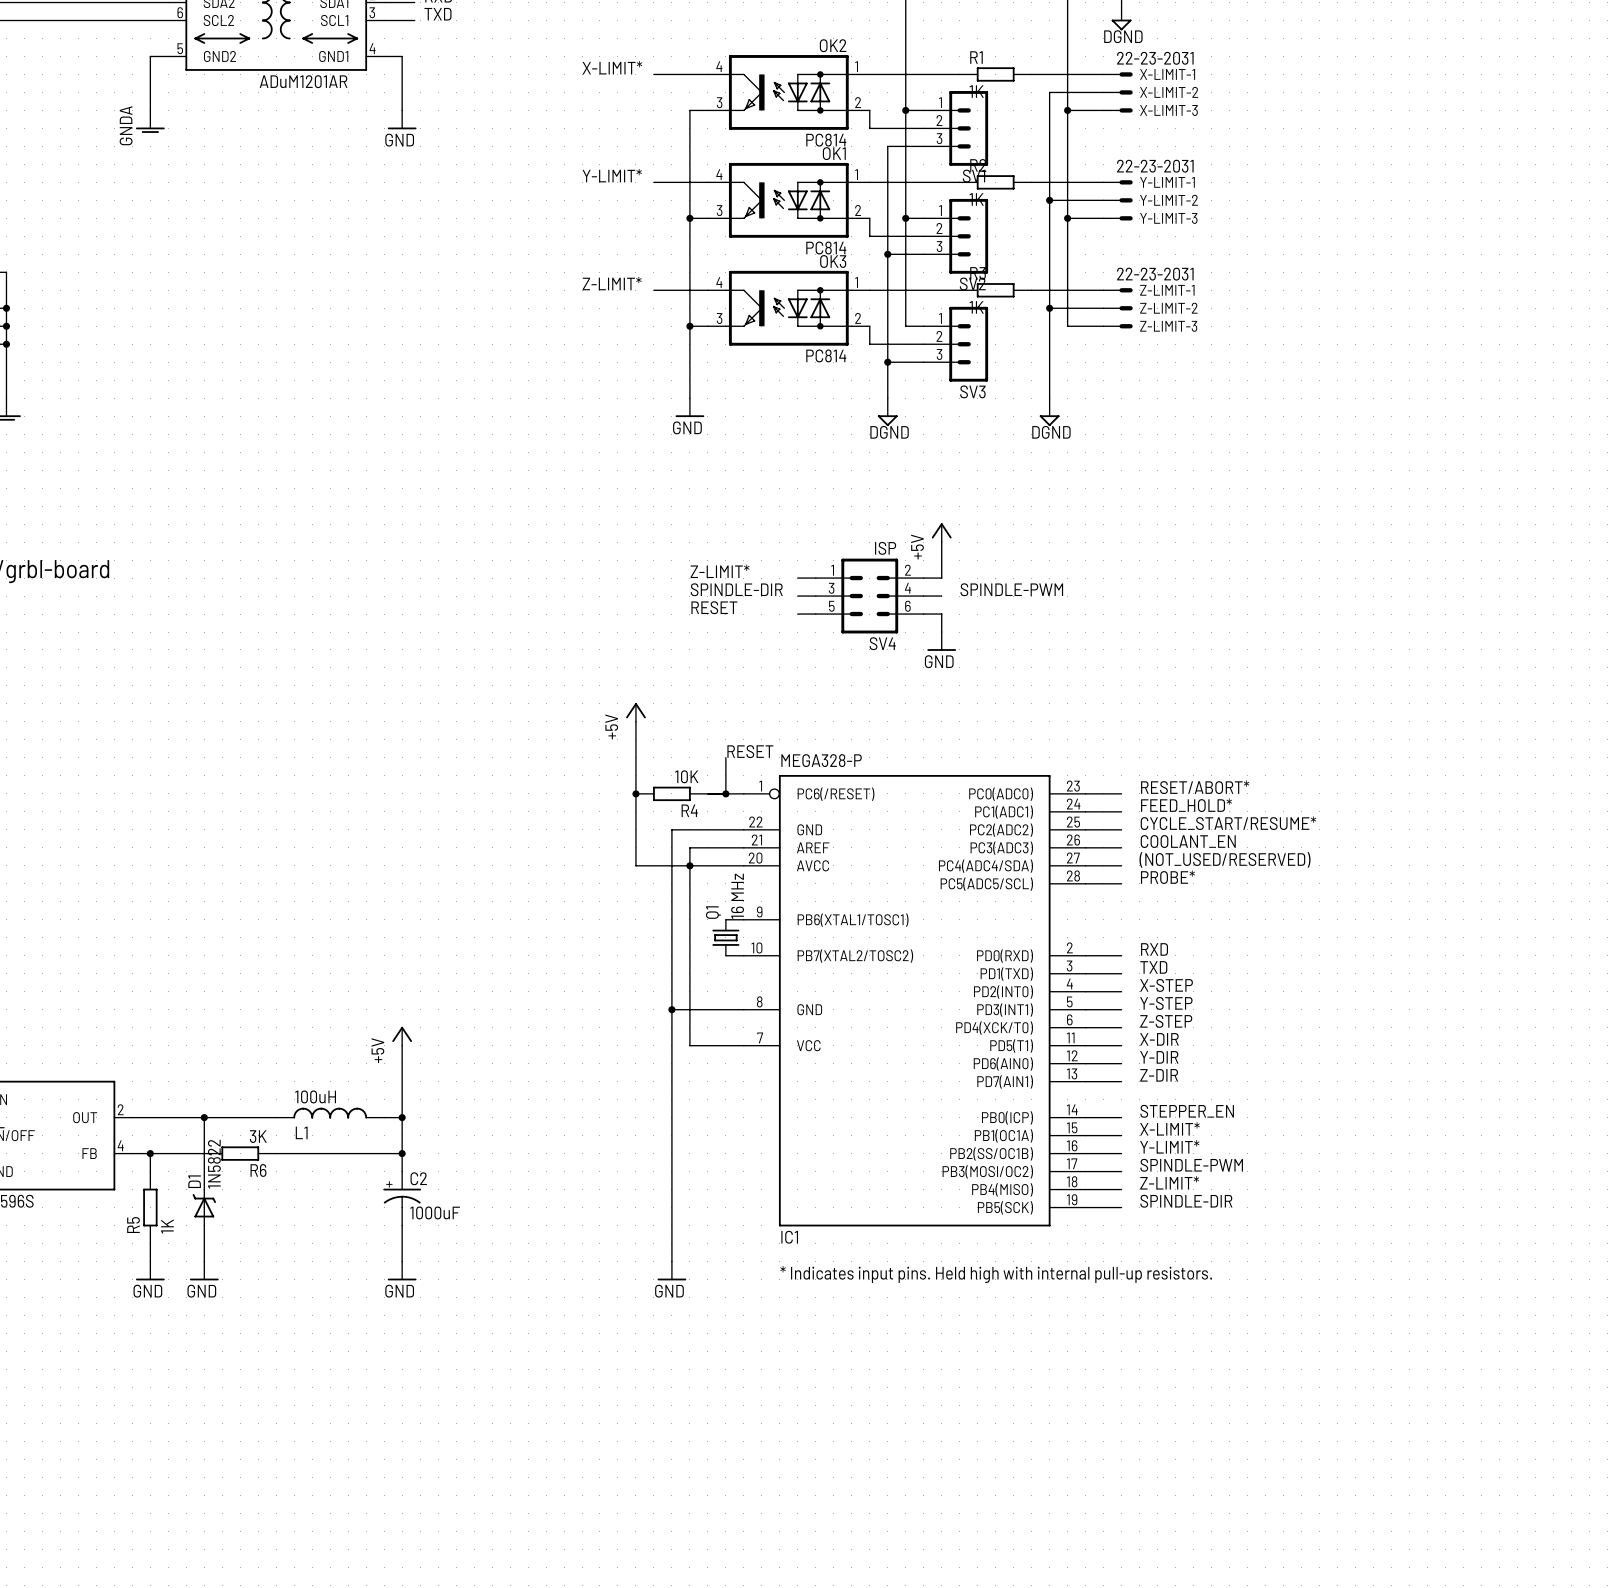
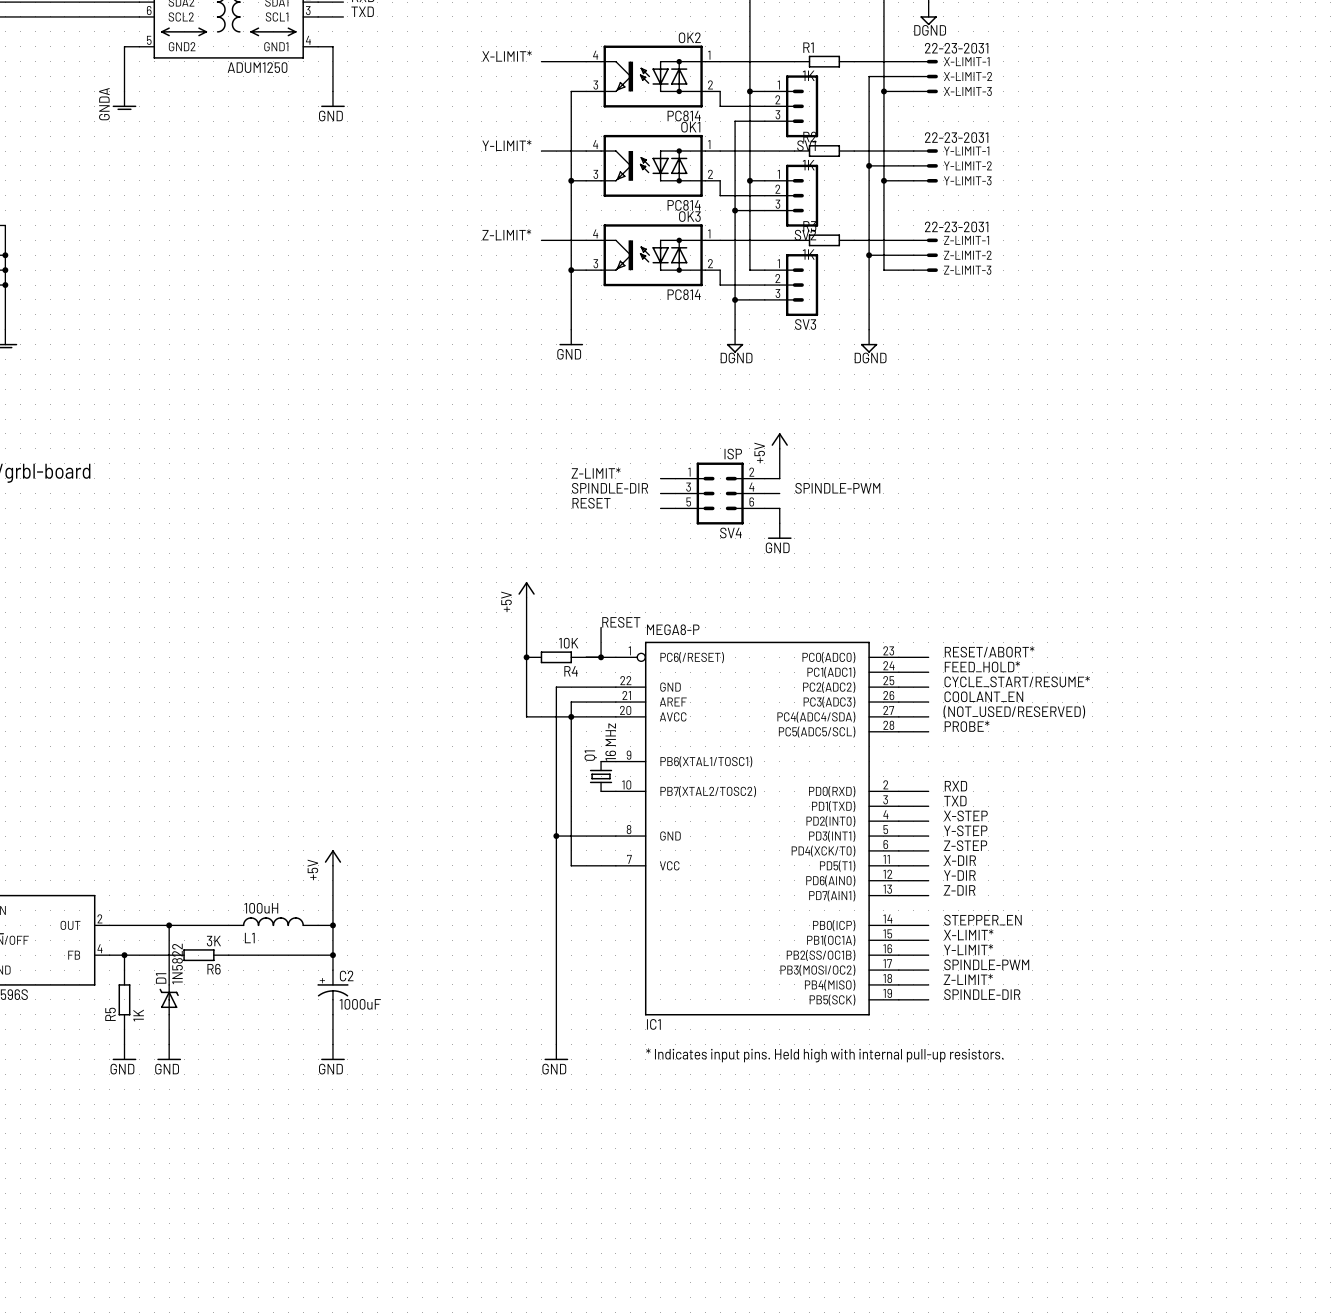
part value: ADuM1201AR (303, 81) -> ADUM1250 (257, 67)
IC1 value: MEGA328-P (821, 760) -> MEGA8-P (673, 629)

